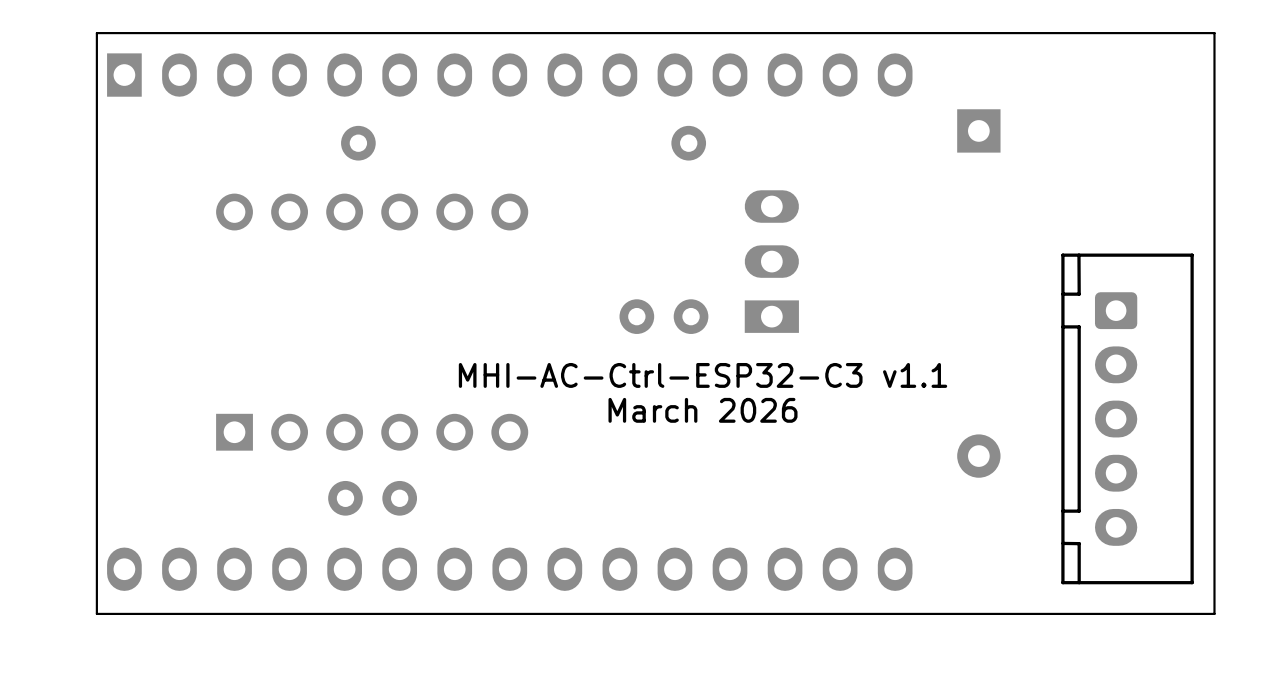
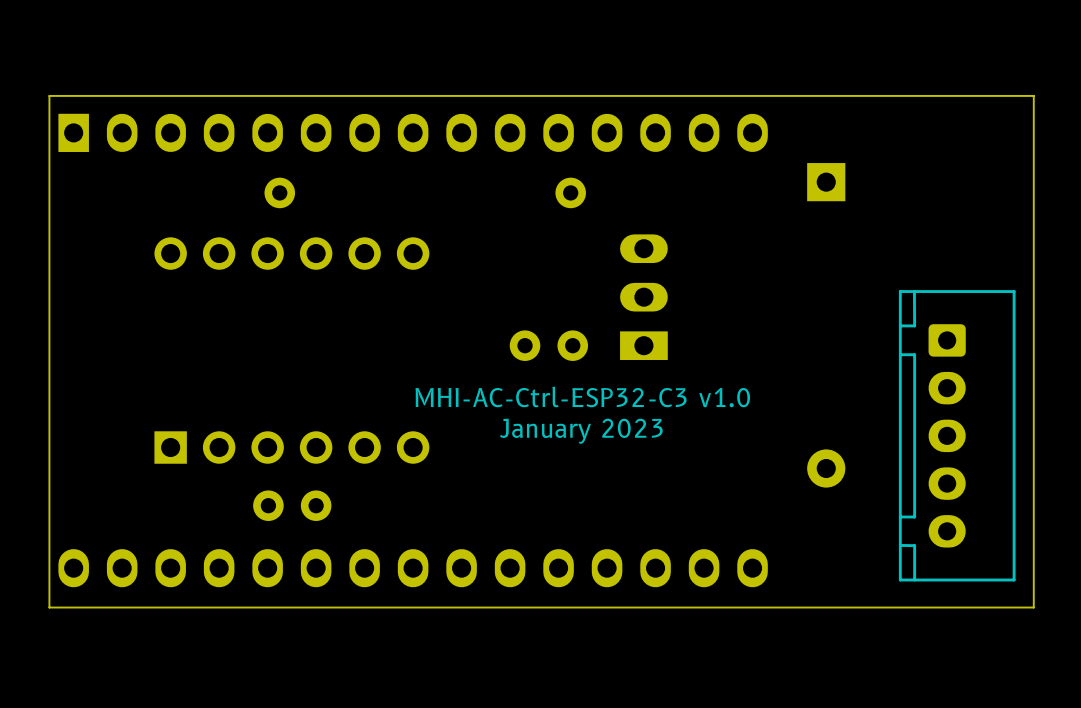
text: MHI-AC-Ctrl-ESP32-C3 v1.1 (702, 375) -> MHI-AC-Ctrl-ESP32-C3 v1.0 (582, 396)
text: March 2026 (702, 410) -> January 2023 (581, 431)

